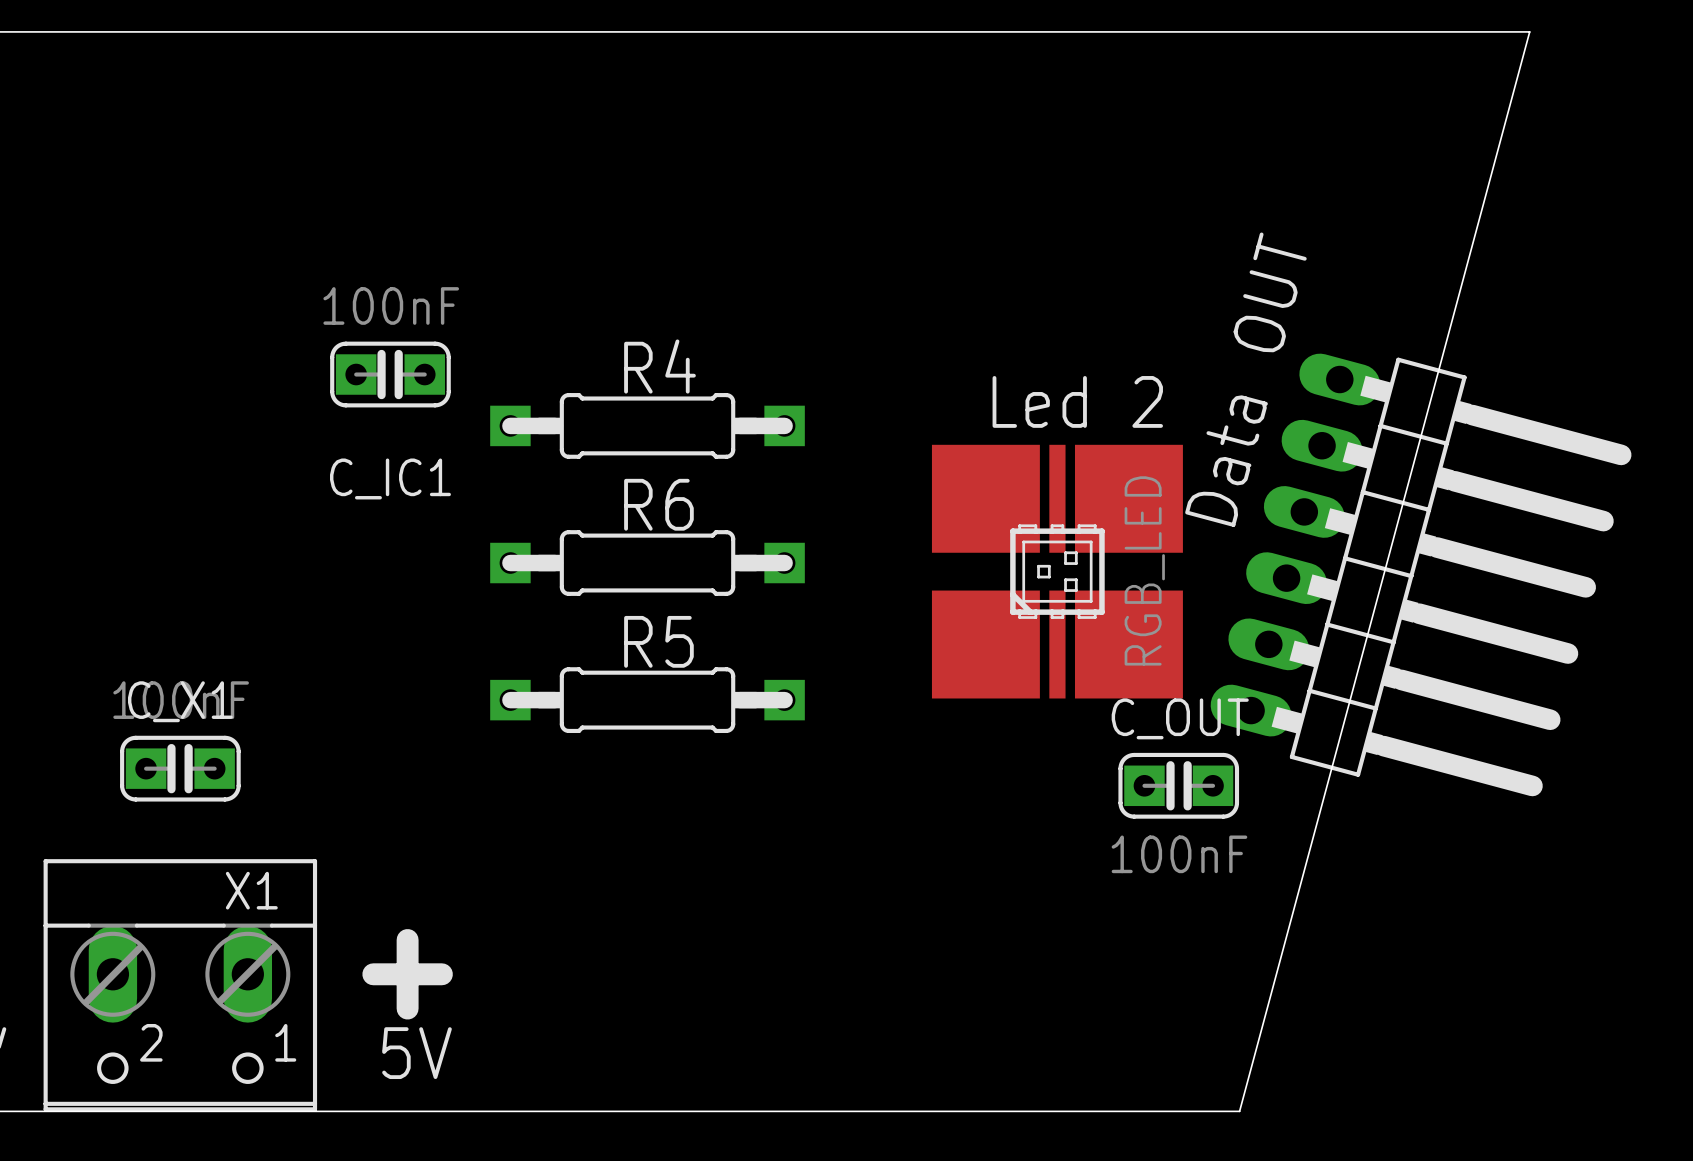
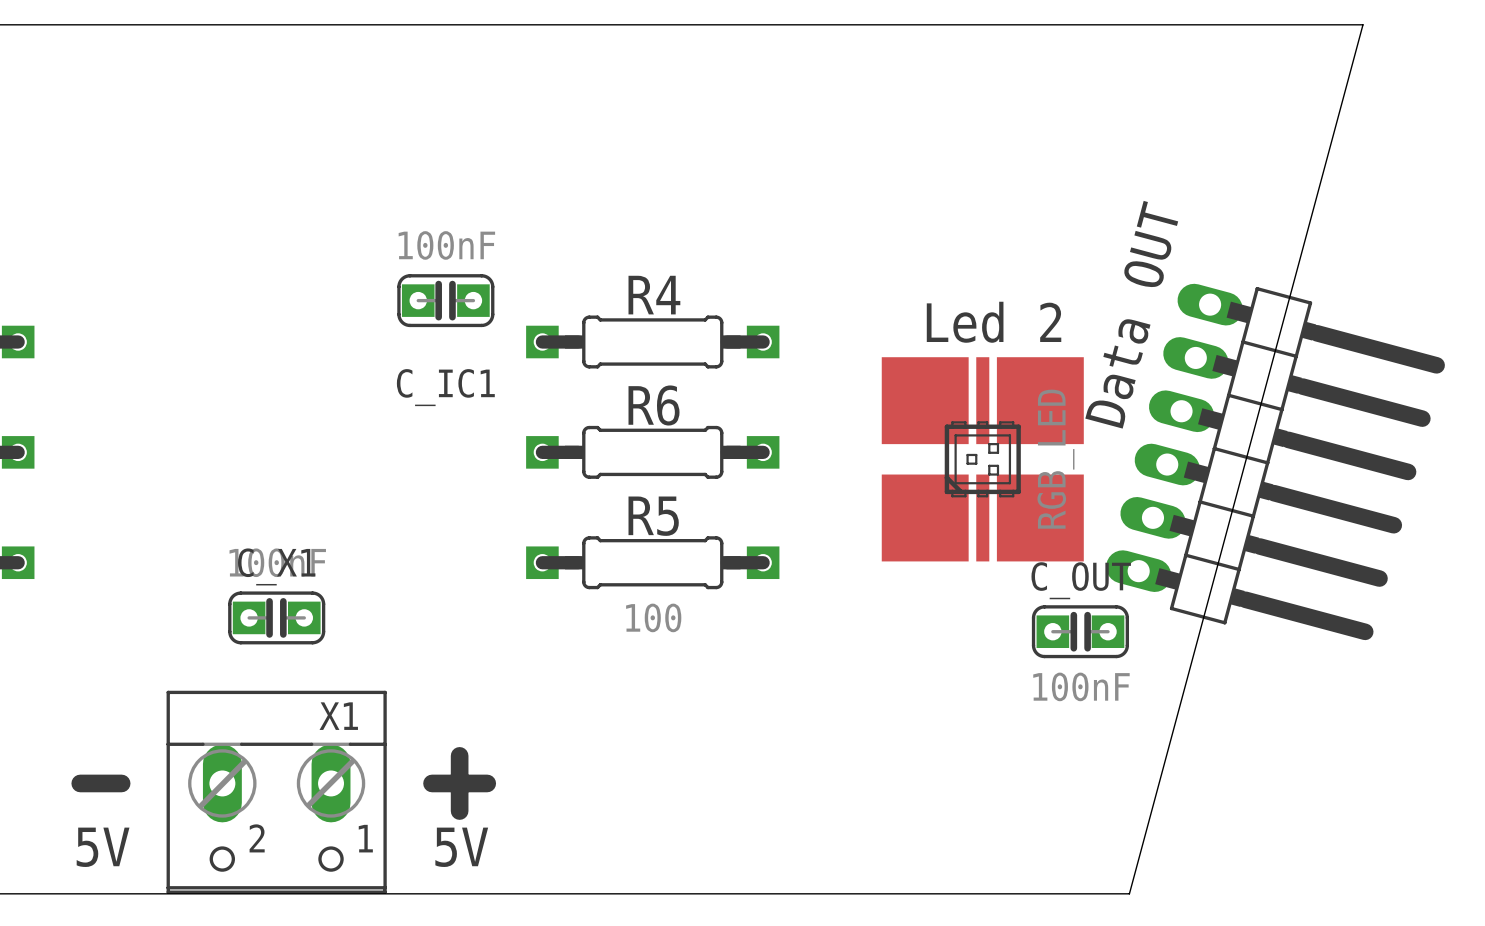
part value: none -> 100 (653, 617)

